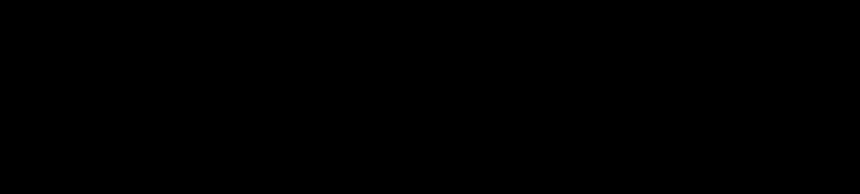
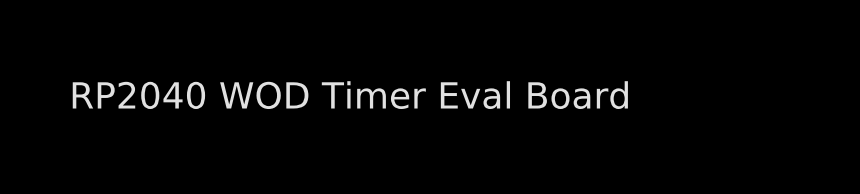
text: none -> RP2040 WOD Timer Eval Board (350, 95)

